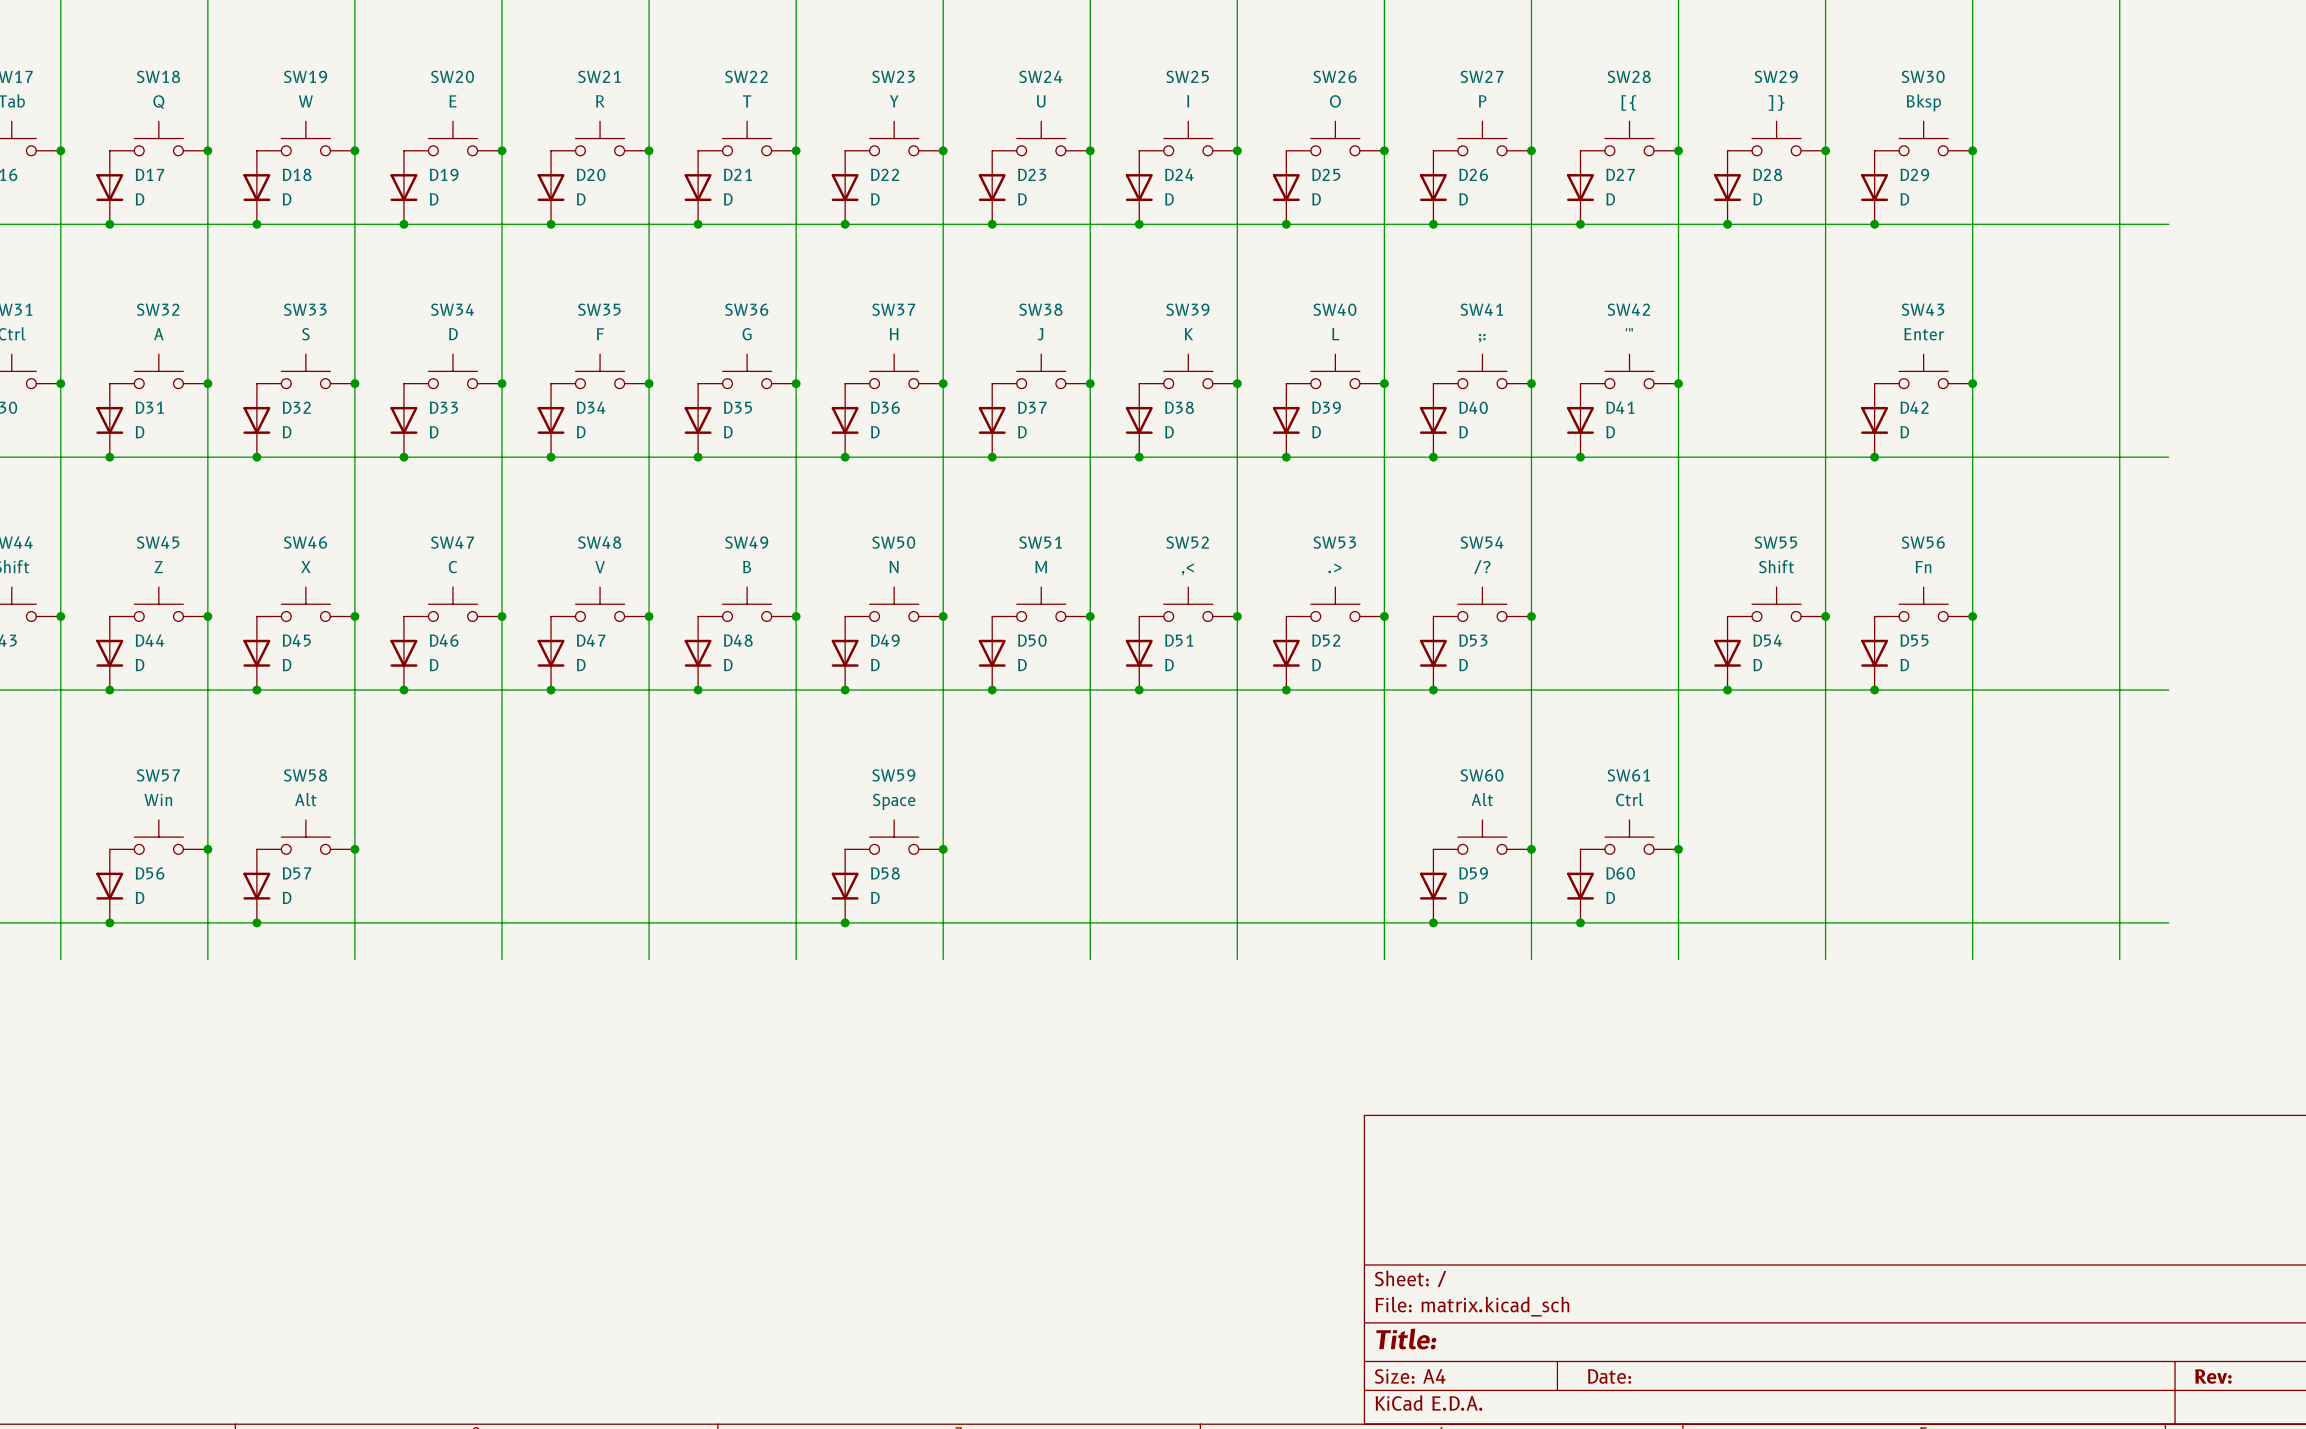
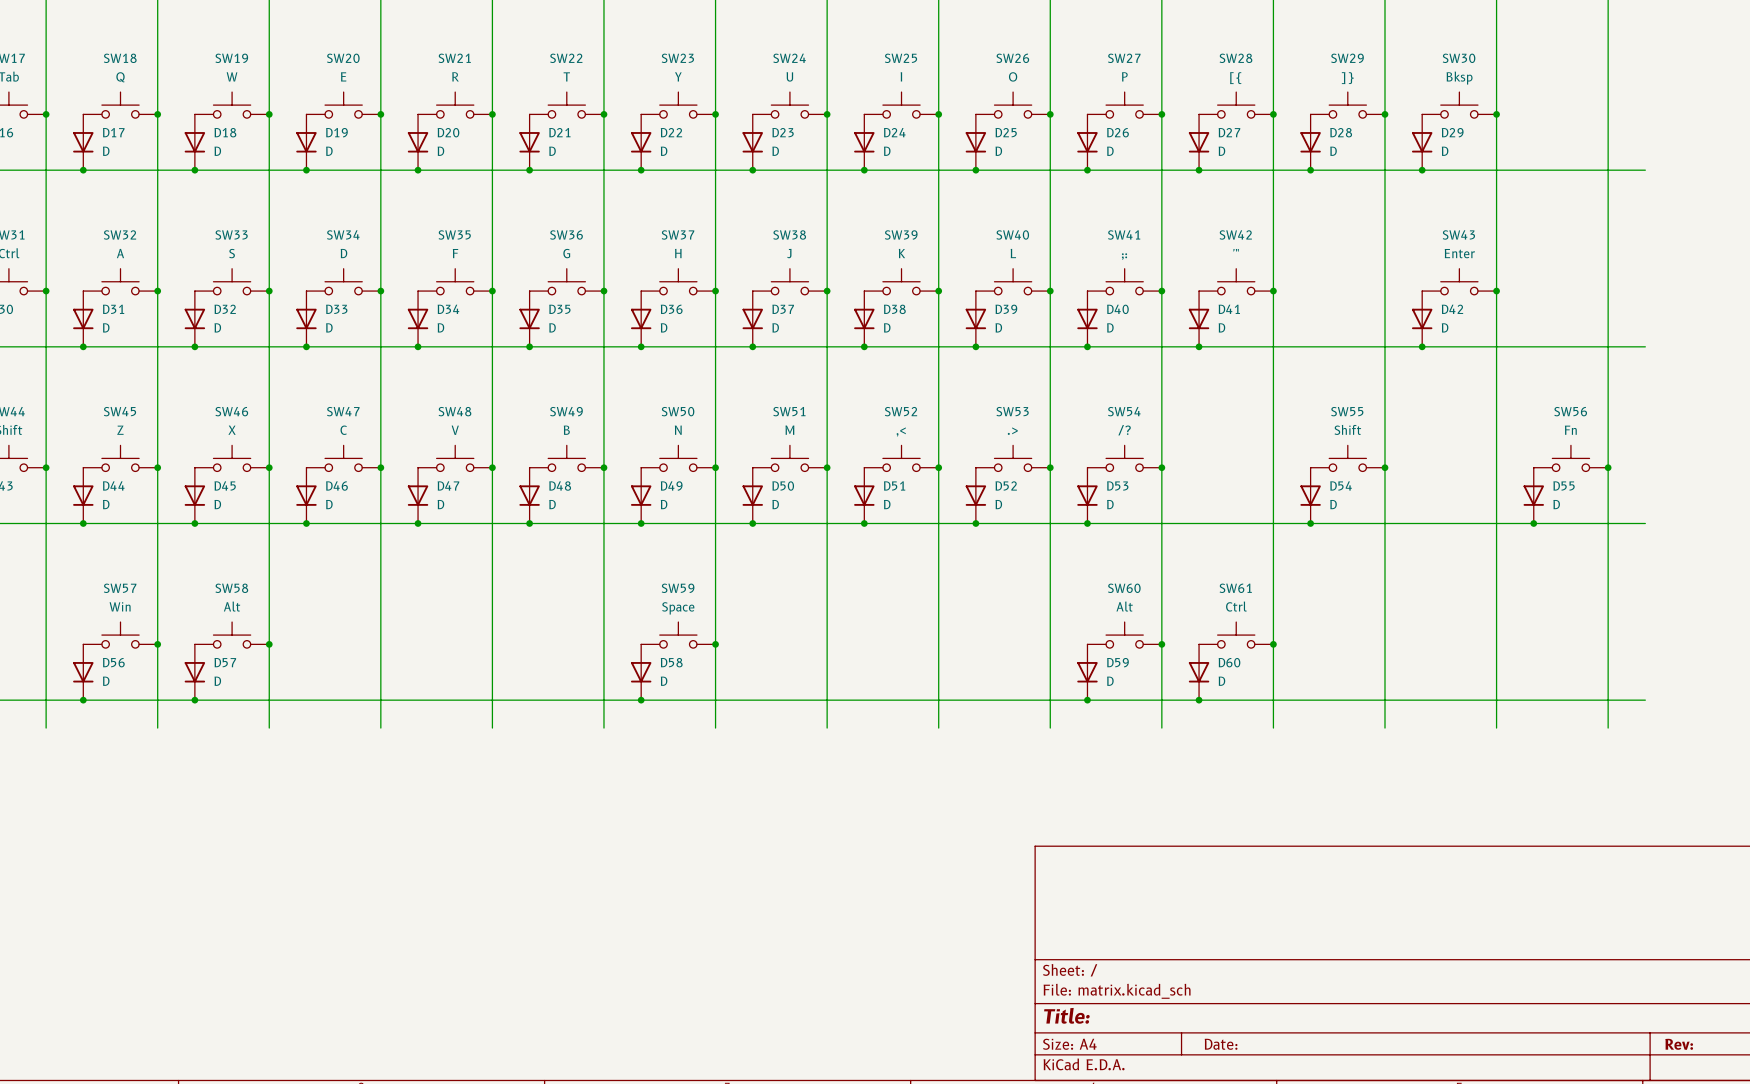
SW56 position: (1923, 604) -> (1570, 458)
junction: (1972, 616) -> none
junction: none -> (1608, 467)
D55 position: (1874, 653) -> (1533, 495)
junction: (1874, 690) -> none
junction: none -> (1533, 523)

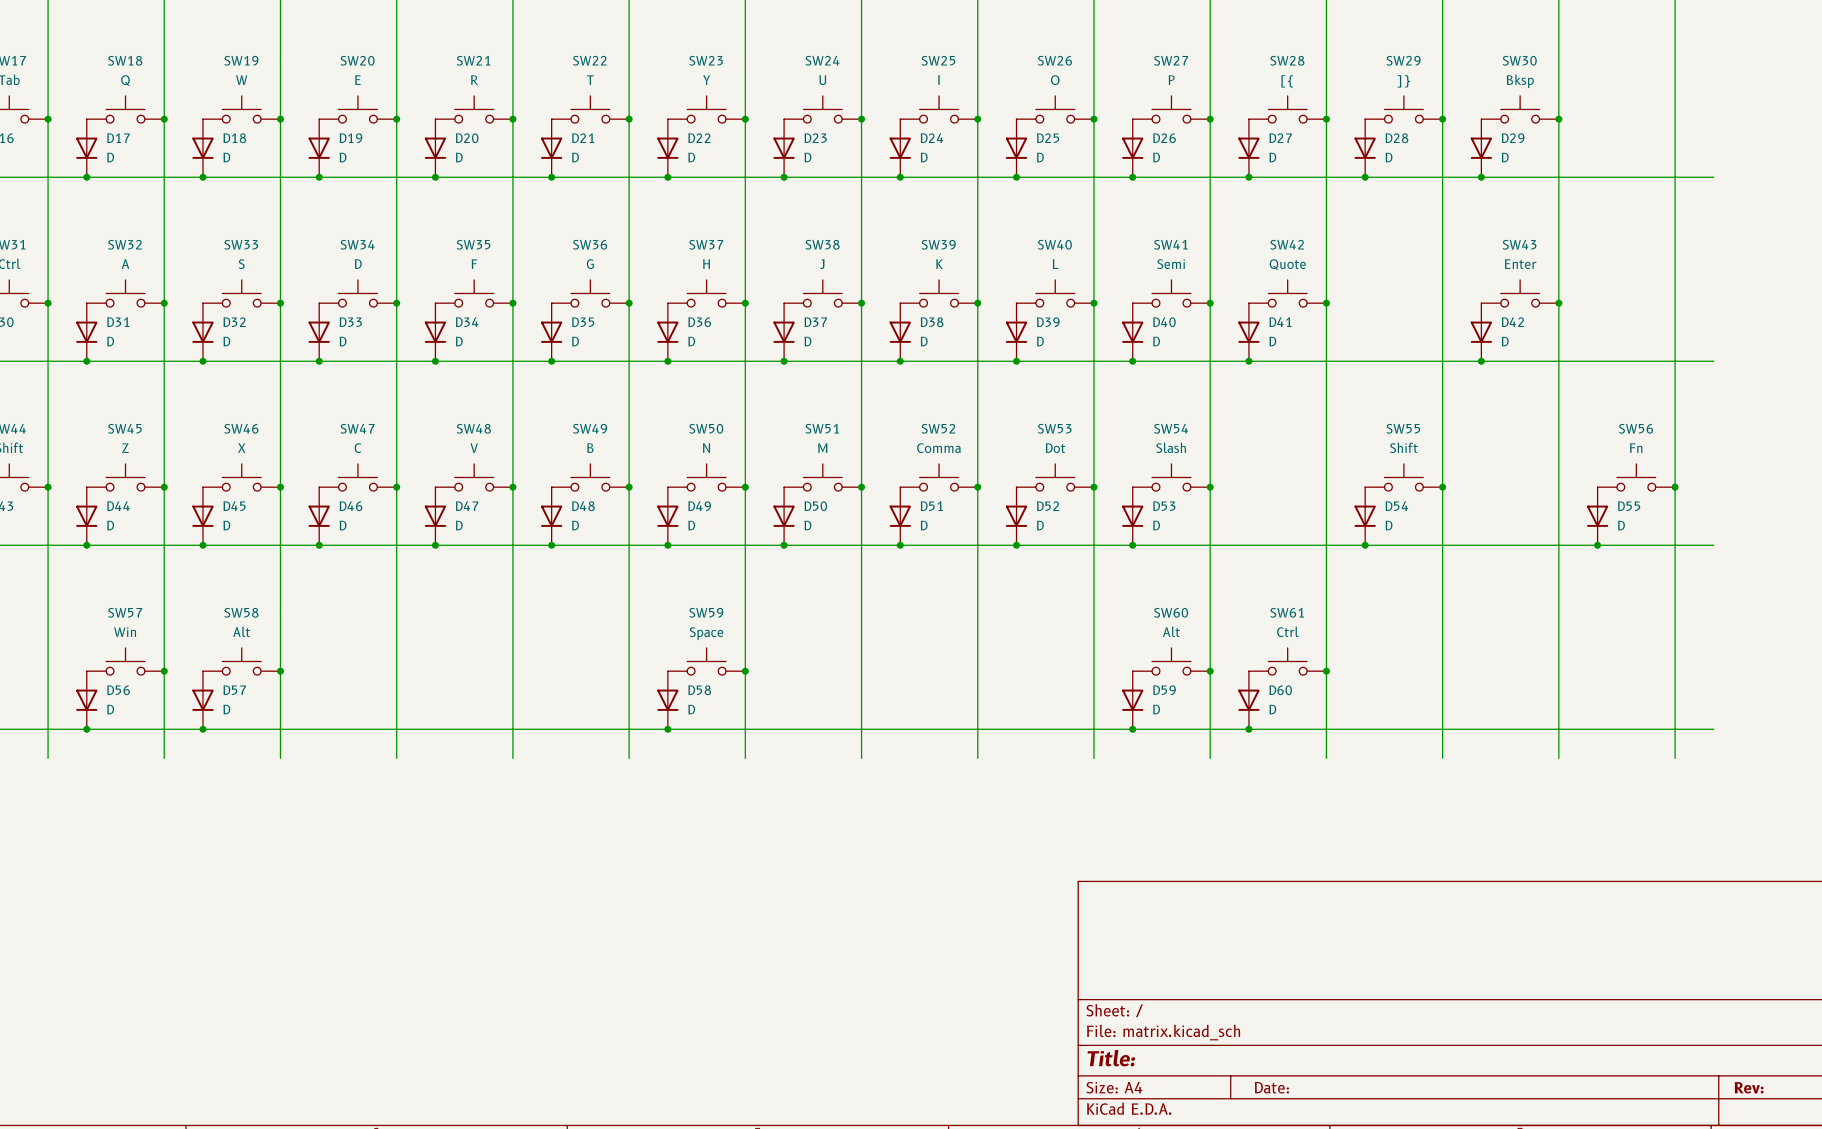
SW42 value: '" (1236, 250) -> Quote (1287, 264)
SW41 value: ;: (1124, 256) -> Semi (1171, 264)
SW54 value: /? (1124, 430) -> Slash (1171, 447)
SW53 value: .> (1012, 431) -> Dot (1055, 448)
SW52 value: ,< (901, 432) -> Comma (938, 448)

